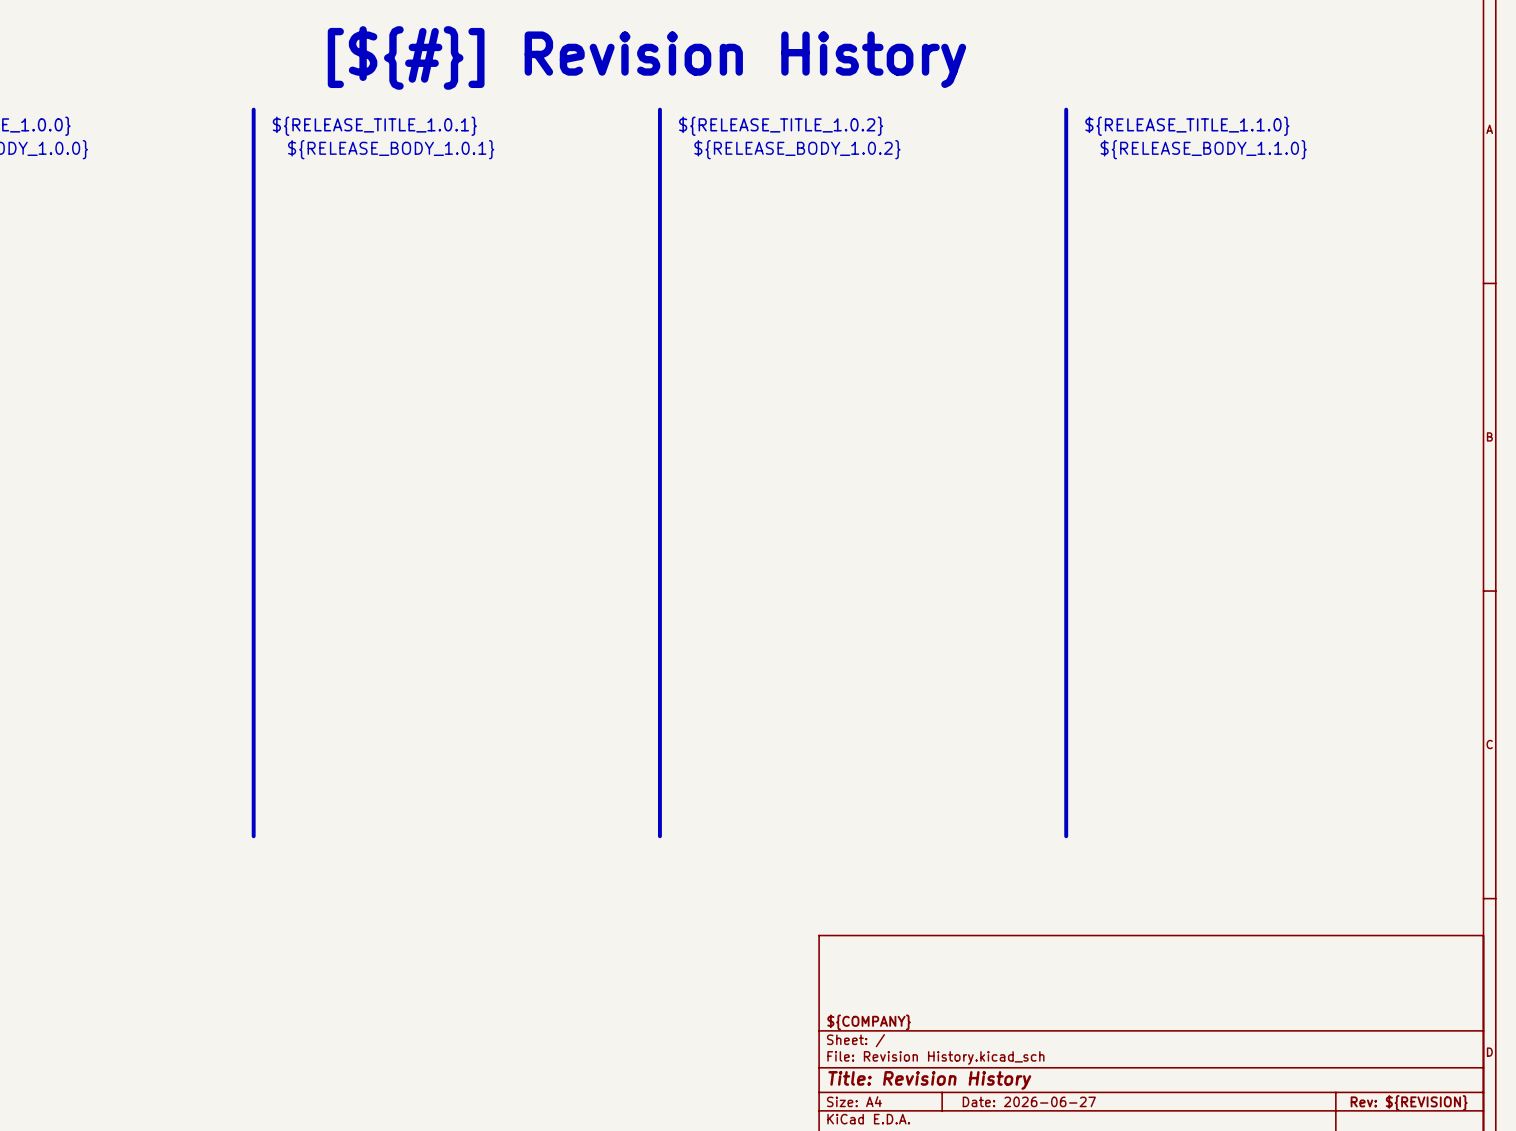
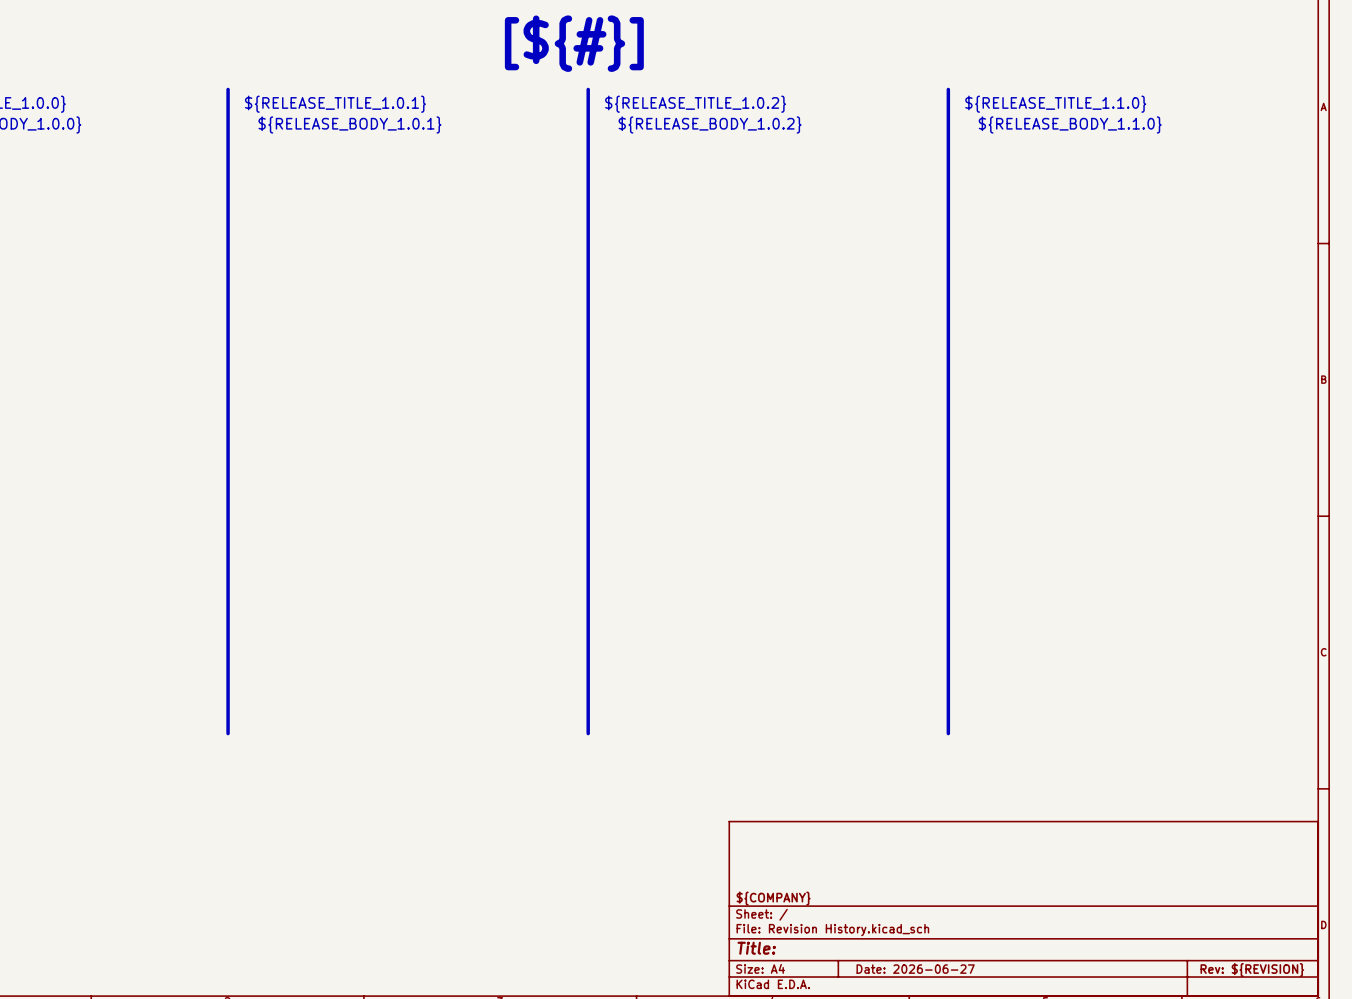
text: [${#}] Revision History (646, 57) -> [${#}] (574, 43)
title block: Title: Revision History (929, 1080) -> Title: (756, 948)

